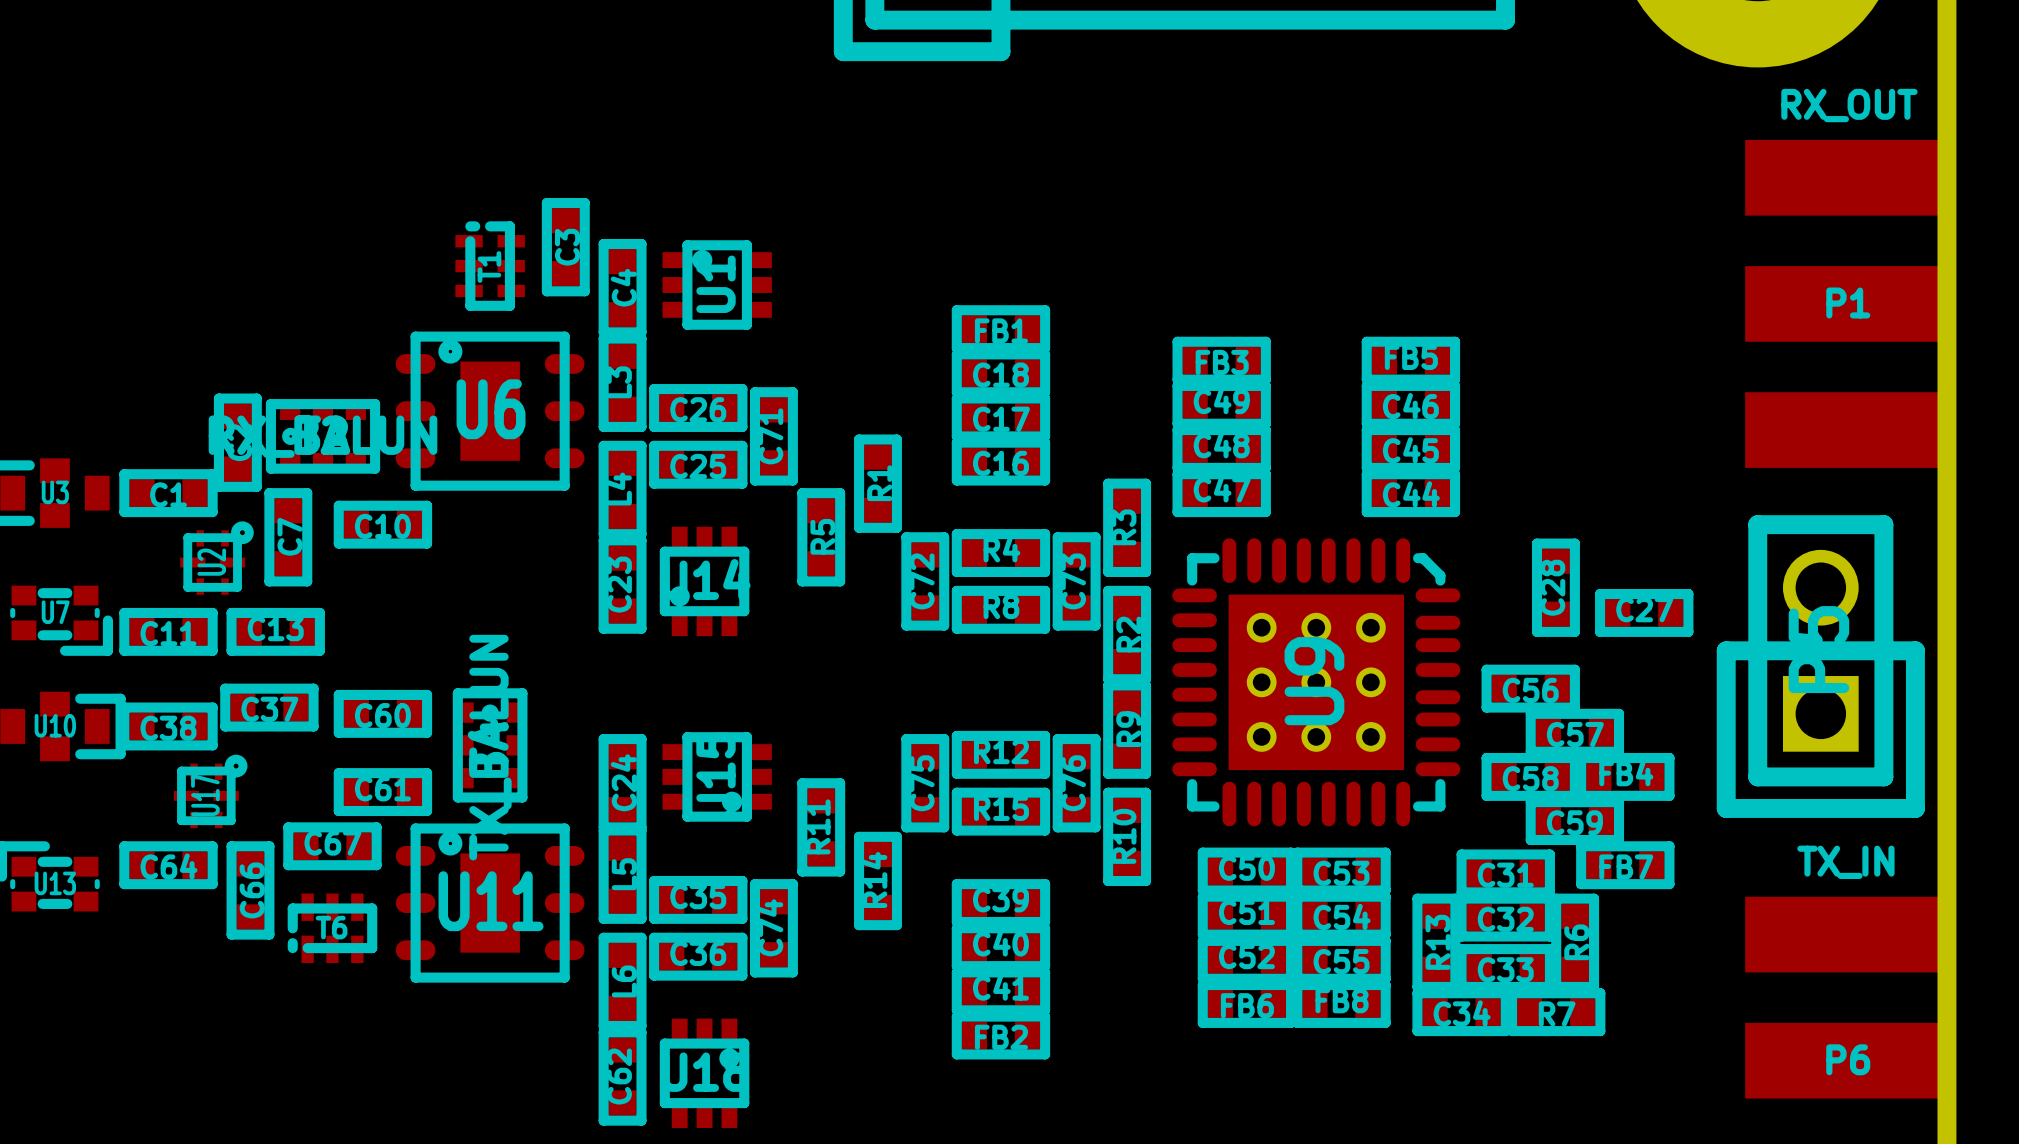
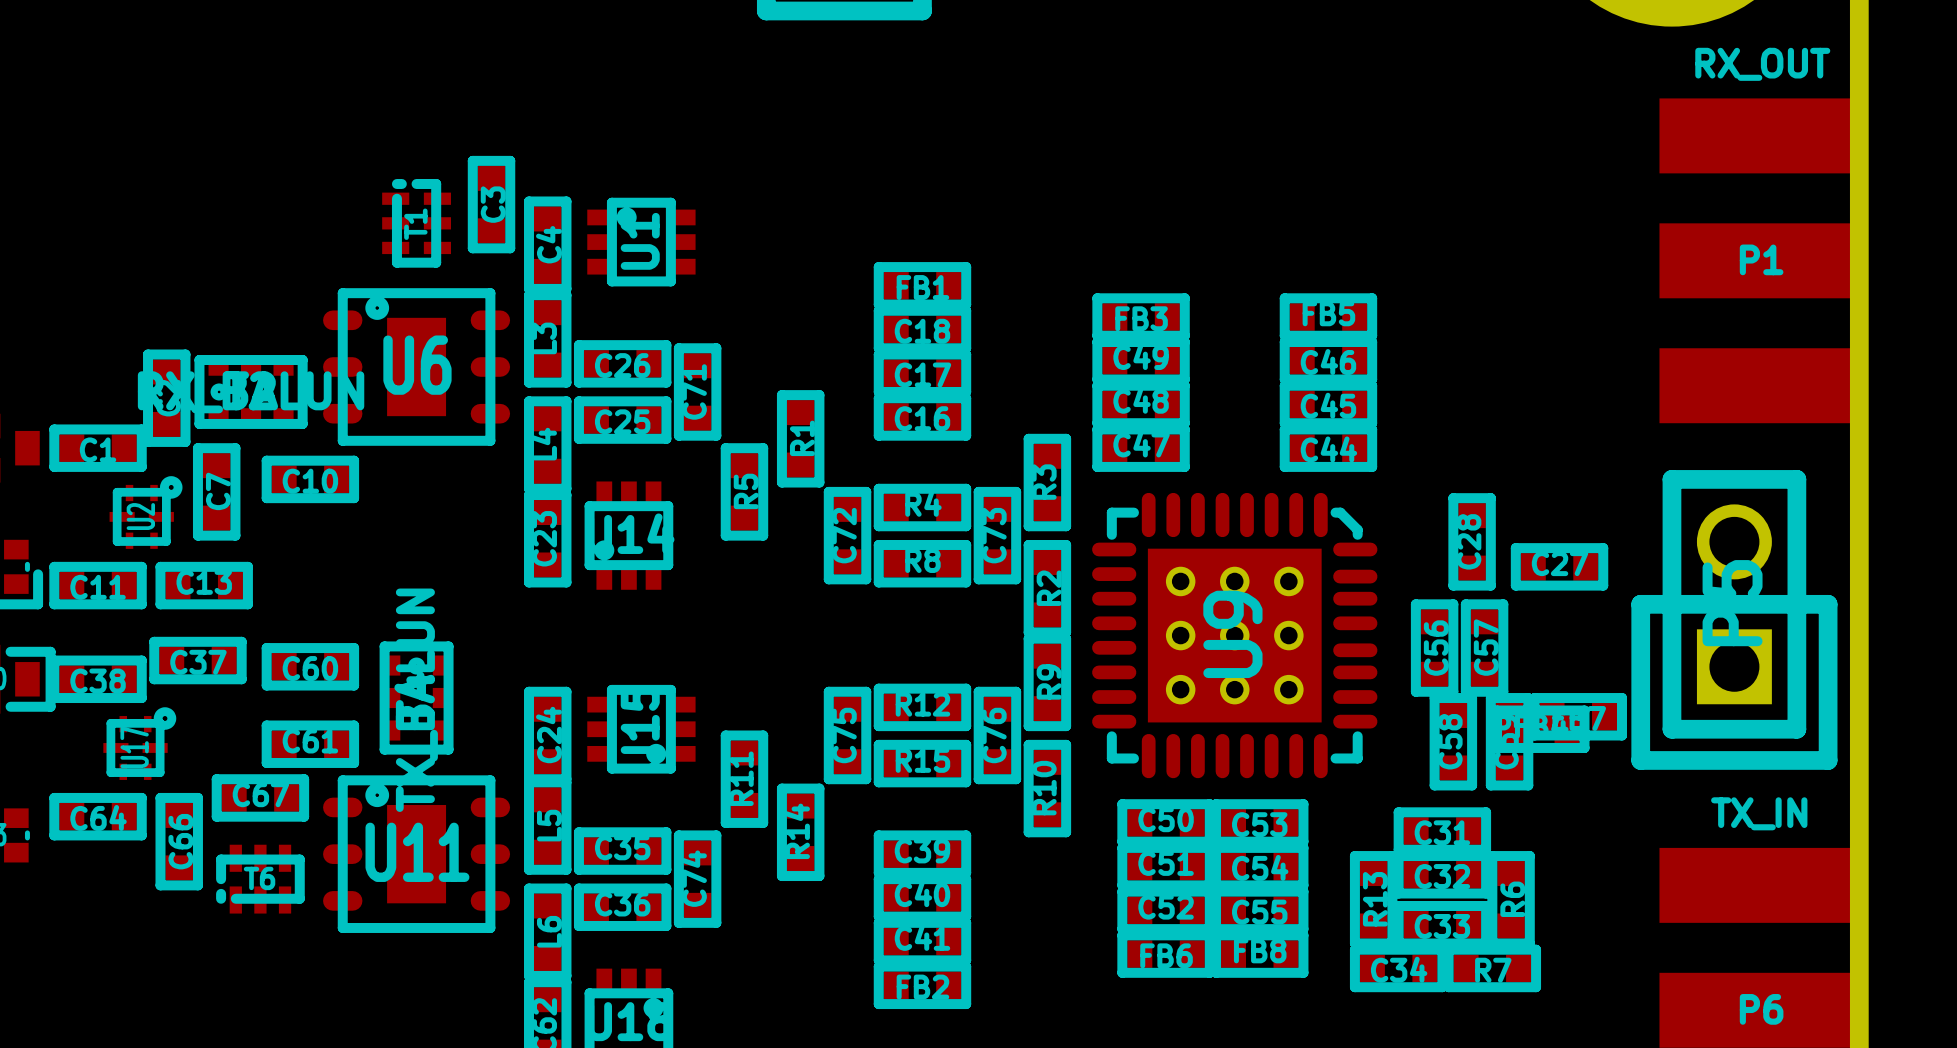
C56 rotation: 0° (1530, 688) -> 90° clockwise (1434, 648)
C57 rotation: 0° (1574, 732) -> 90° clockwise (1484, 648)
C58 rotation: 0° (1530, 776) -> 90° clockwise (1453, 741)
C59 rotation: 0° (1574, 821) -> 90° clockwise (1509, 741)
FB7 position: (1625, 865) -> (1578, 716)
C31 position: (1505, 873) -> (1442, 831)
C32 position: (1505, 917) -> (1442, 874)
R13 position: (1436, 942) -> (1373, 899)
R6 position: (1575, 942) -> (1511, 899)
C33 position: (1505, 968) -> (1442, 924)
C34 position: (1461, 1012) -> (1398, 968)
R7 position: (1556, 1012) -> (1492, 968)

